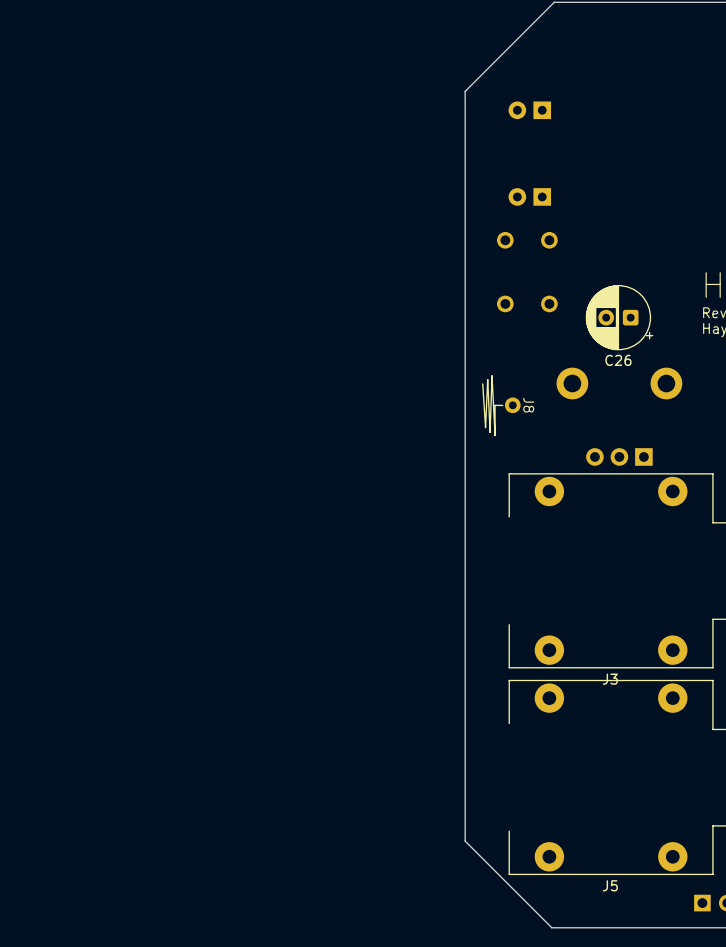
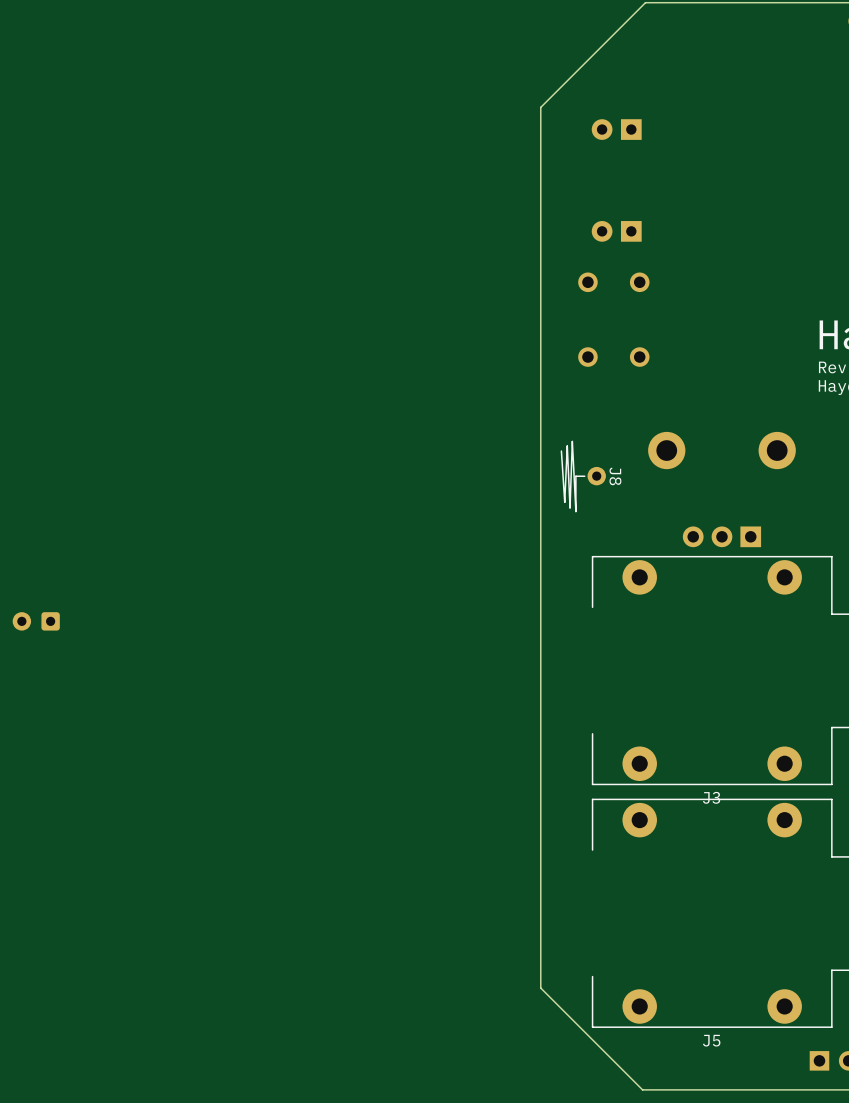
C26: (619, 317) -> none
part: none -> (36, 621)

